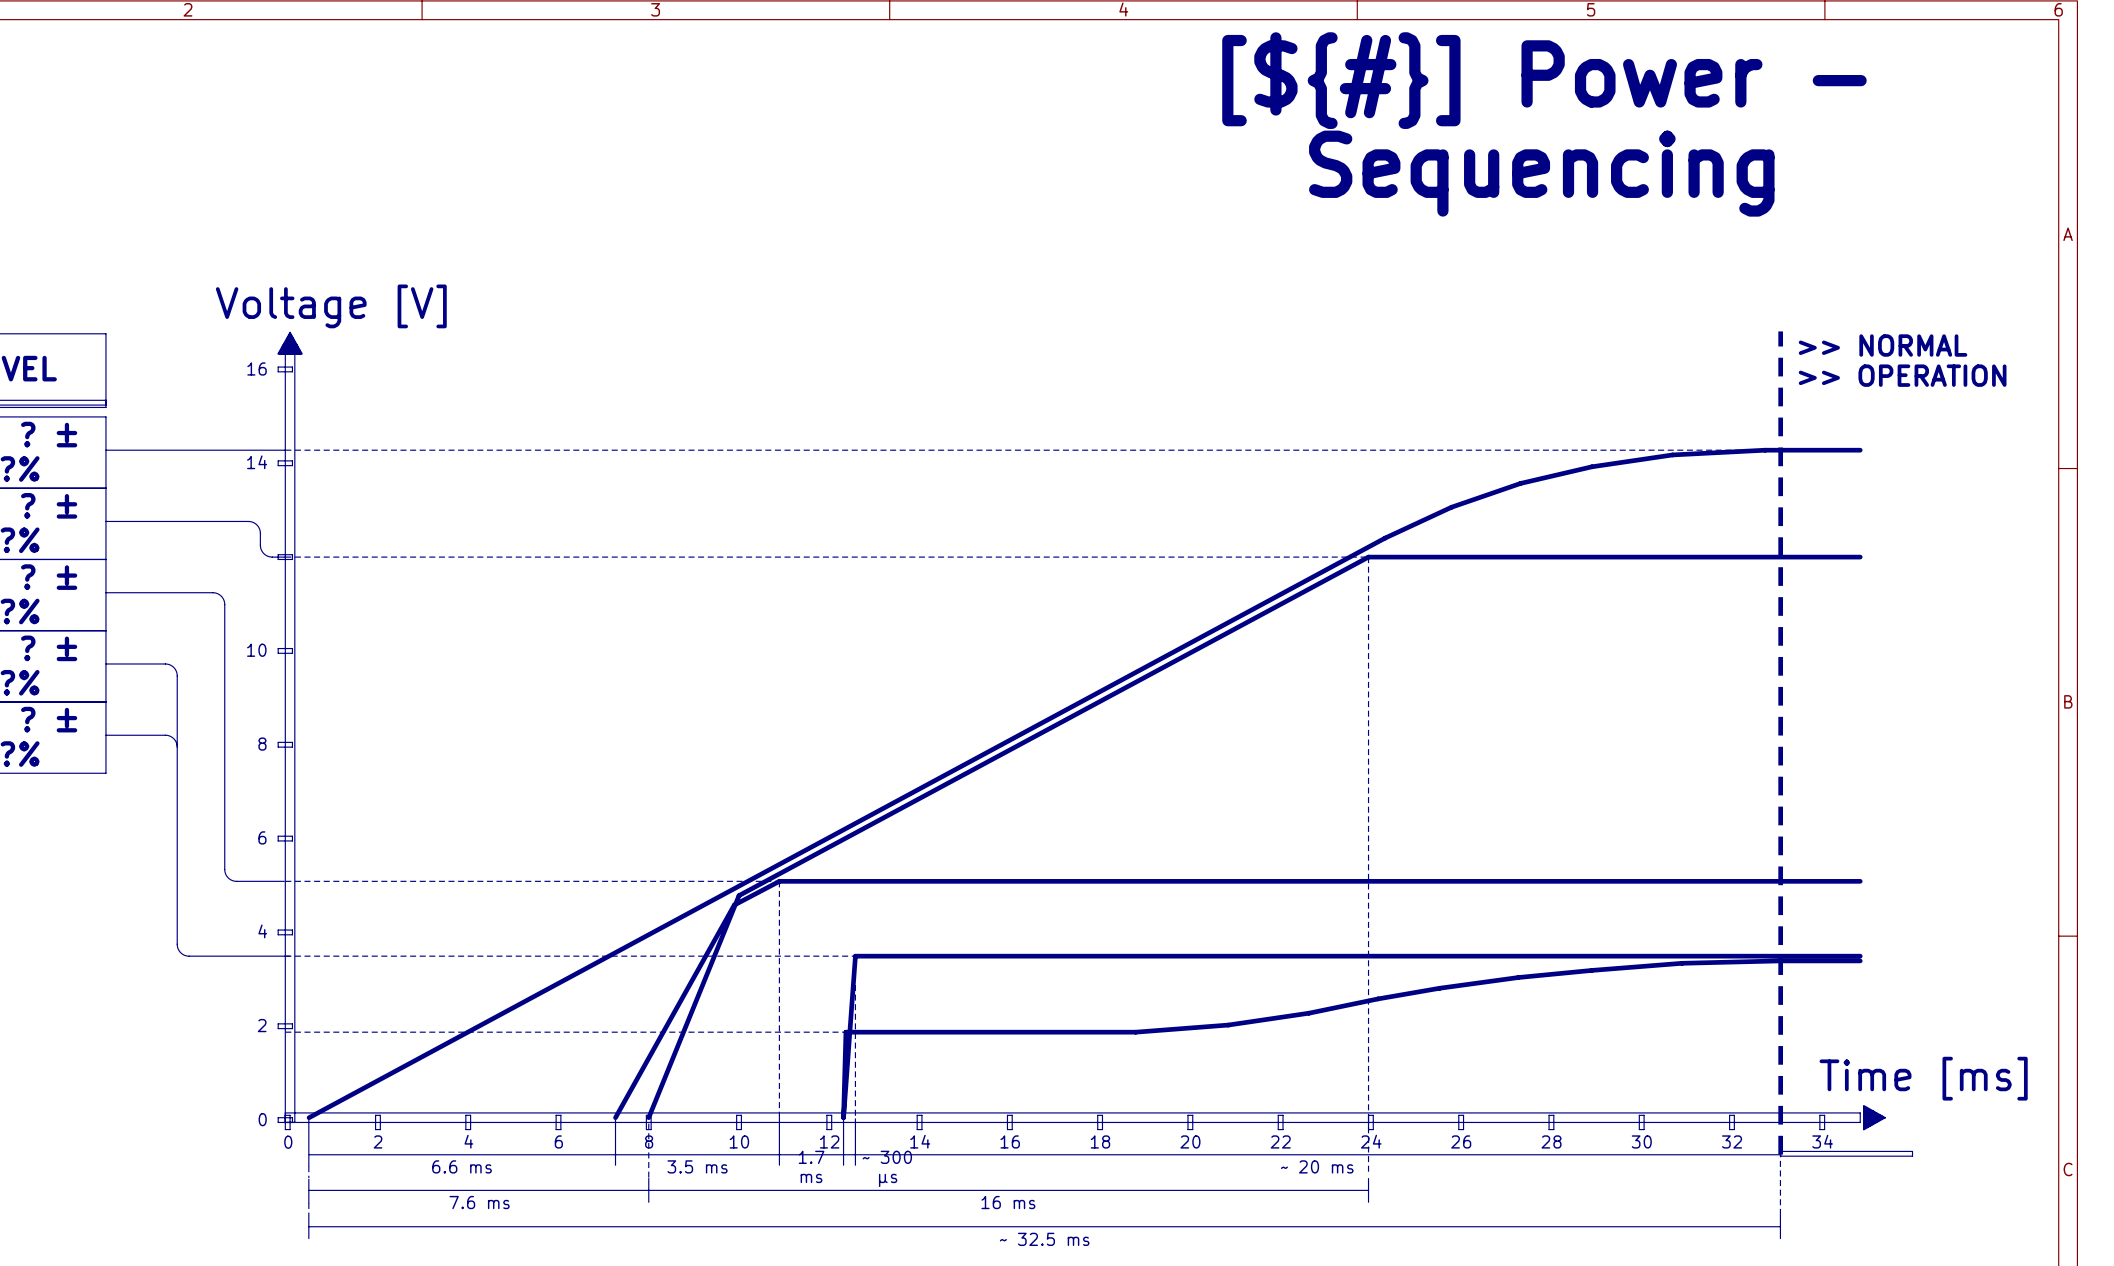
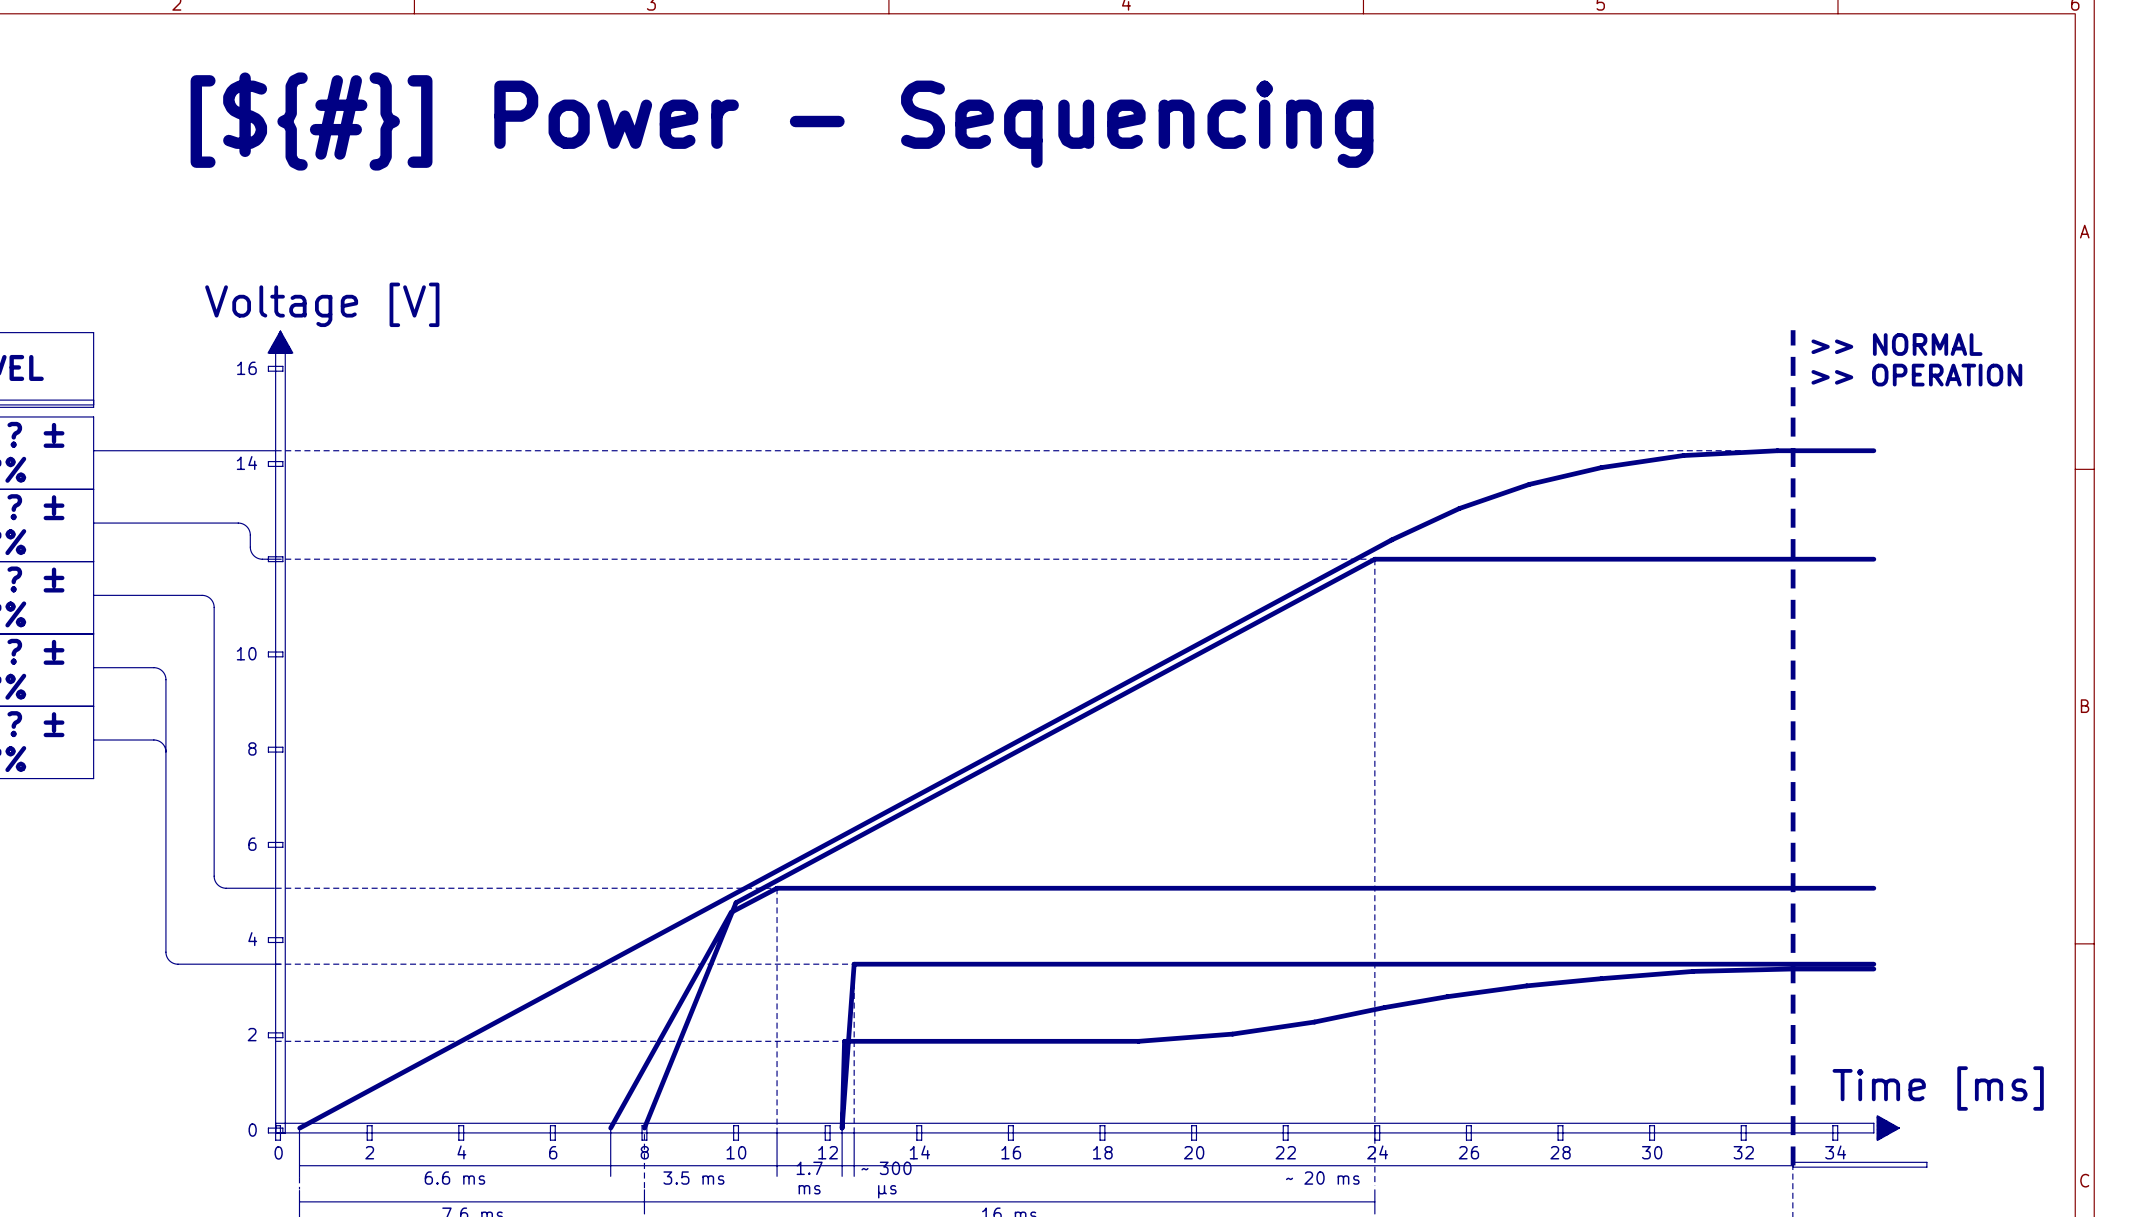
text: [${#}] Power - (1544, 80) -> none
text: none -> [${#}] Power - Sequencing (782, 121)
text: Sequencing (1541, 173) -> none

